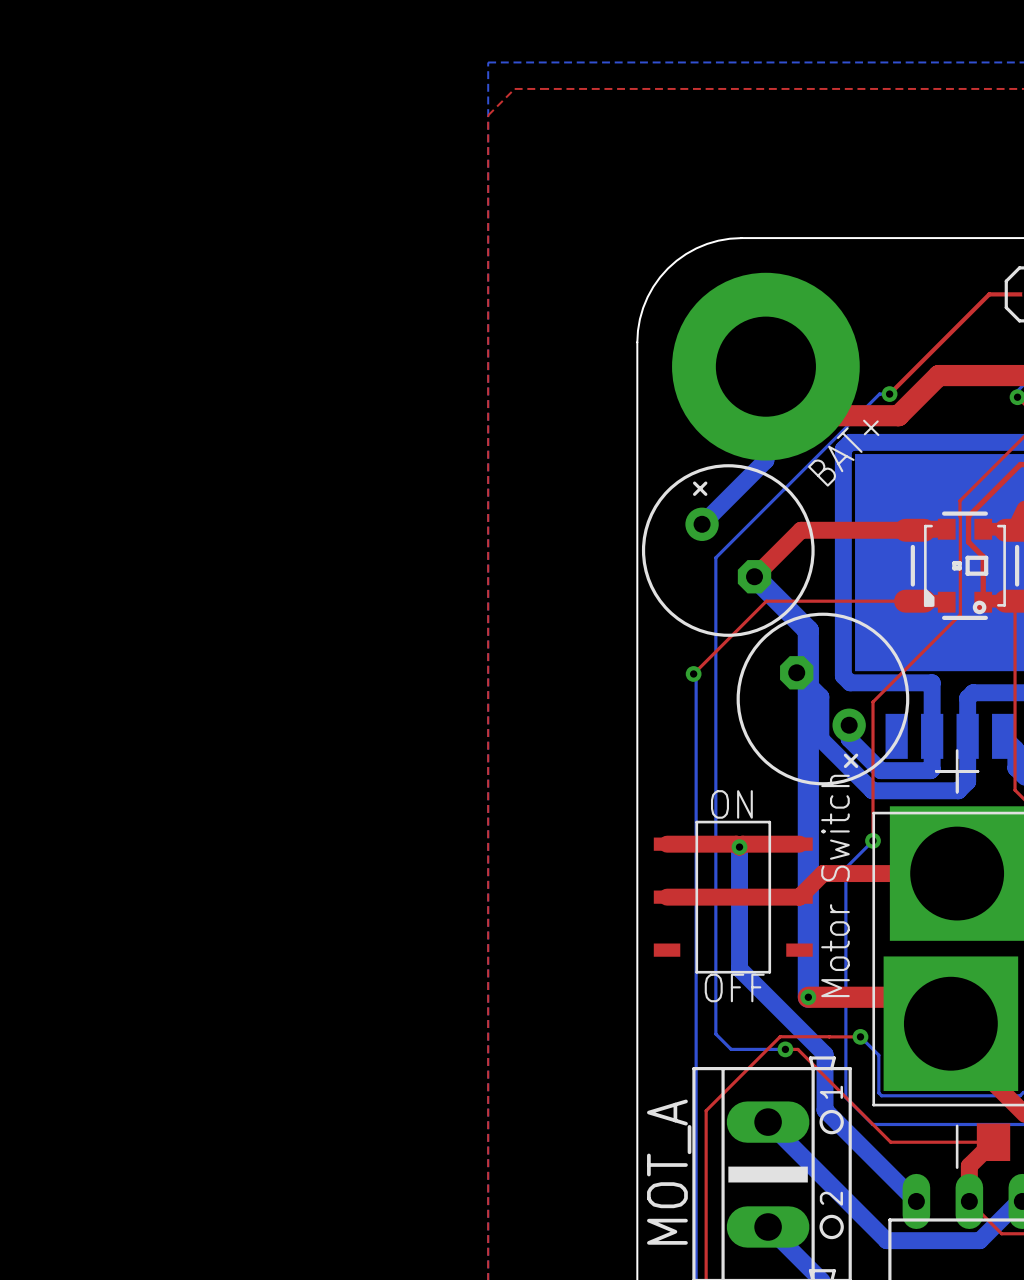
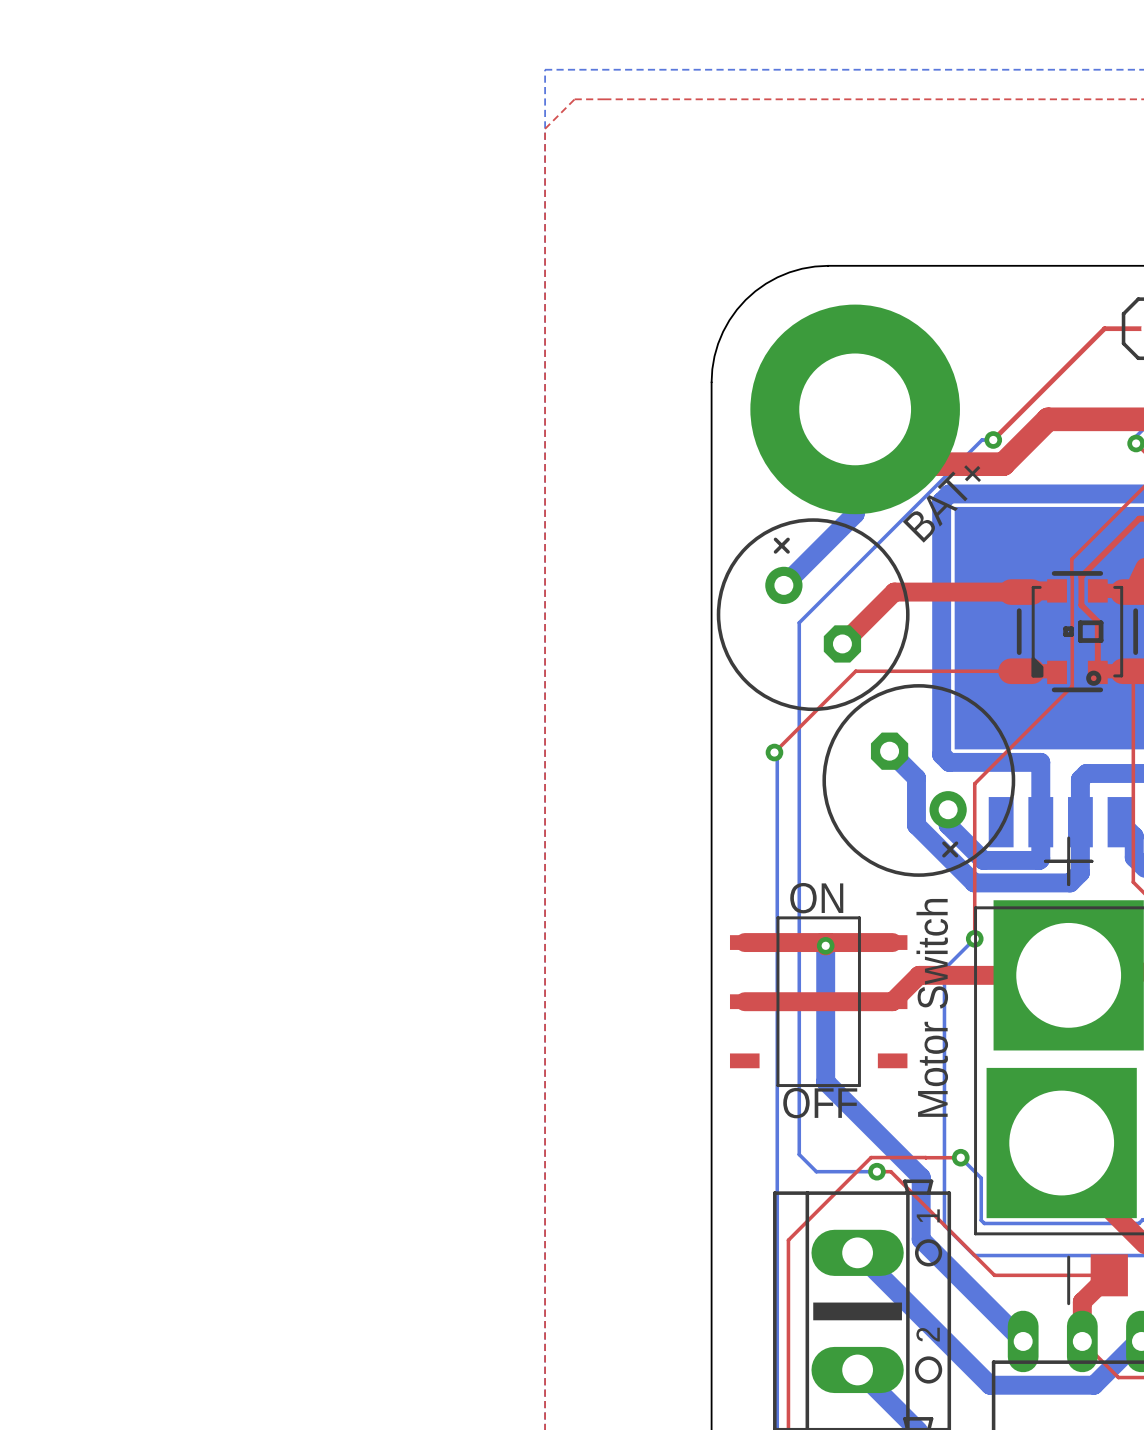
bottom track: (754, 576) (808, 630) (808, 997) -> none
top track: (808, 997) (924, 997) (950, 1023) -> none
via: (808, 997) -> none
MOT_A name: MOT_A (669, 1172) -> none

